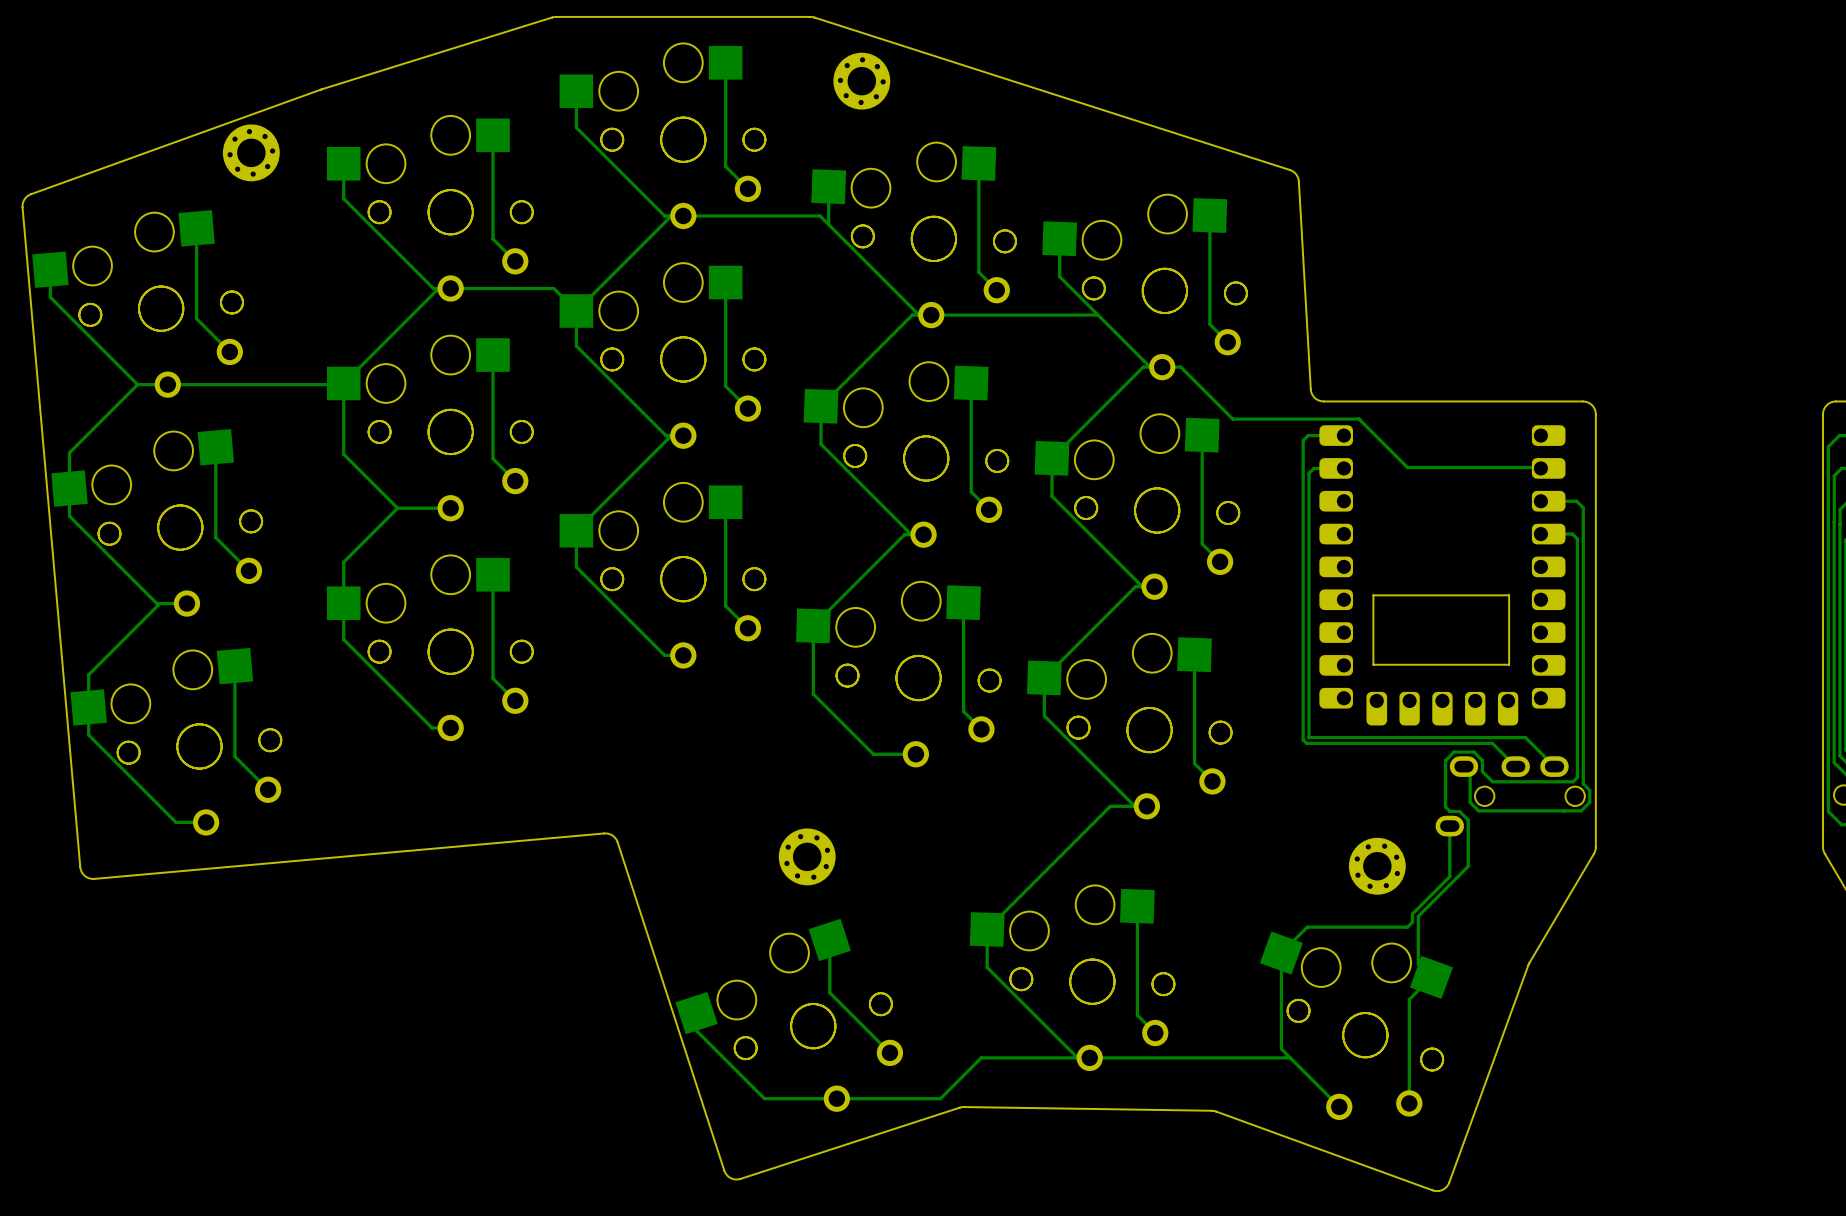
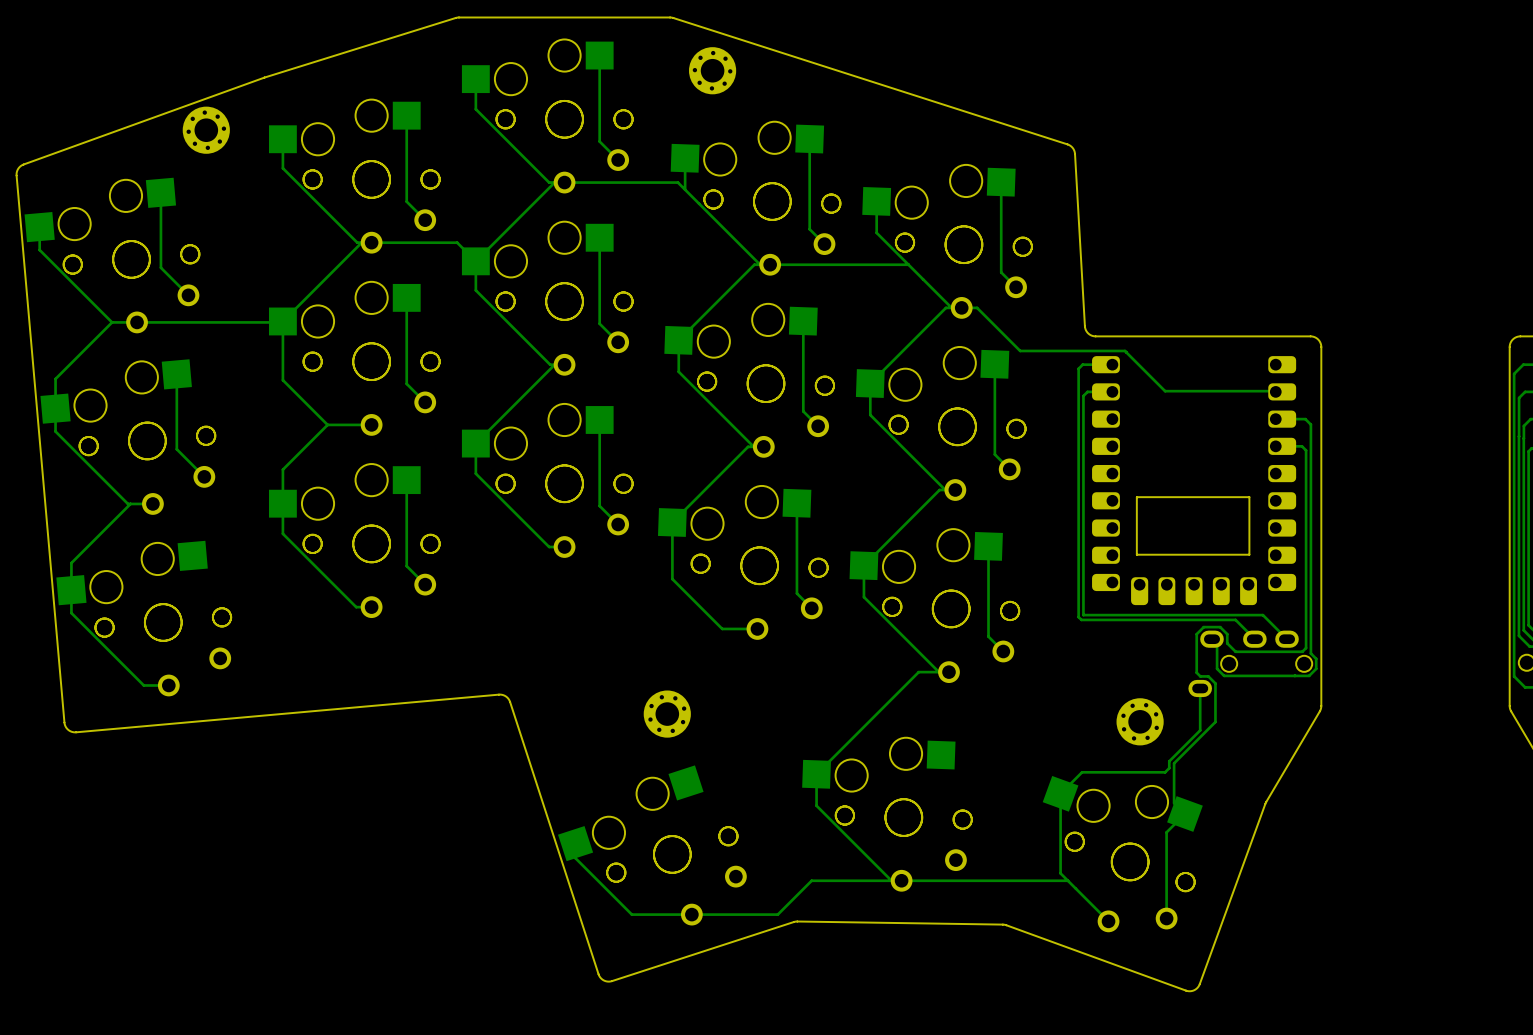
track: (234, 666) (234, 756) (268, 789) -> none
track: (1137, 906) (1137, 1015) (1155, 1033) -> none
track: (829, 939) (829, 992) (889, 1052) -> none

